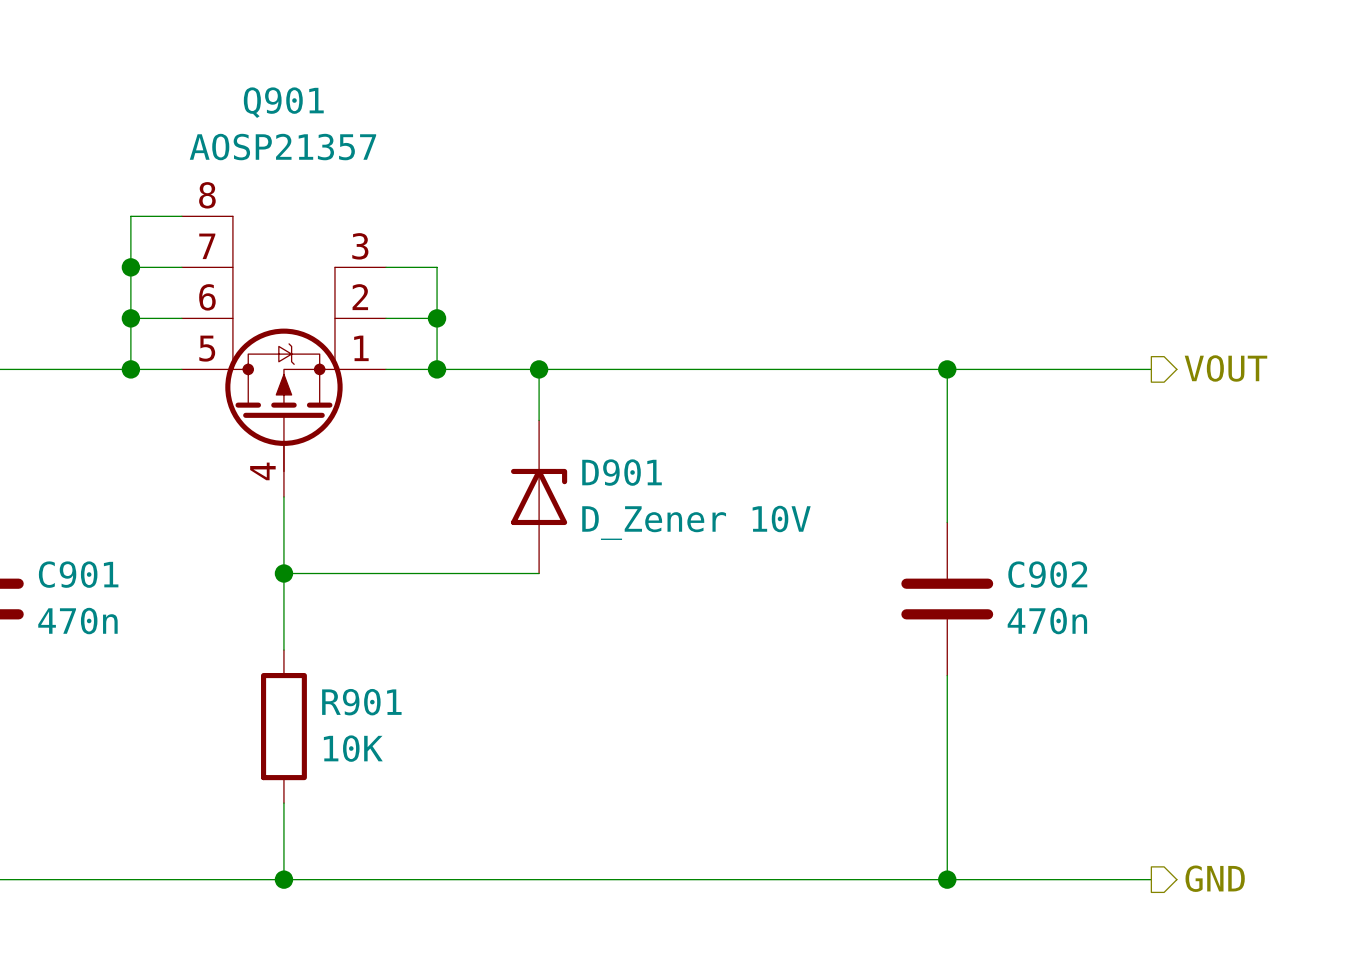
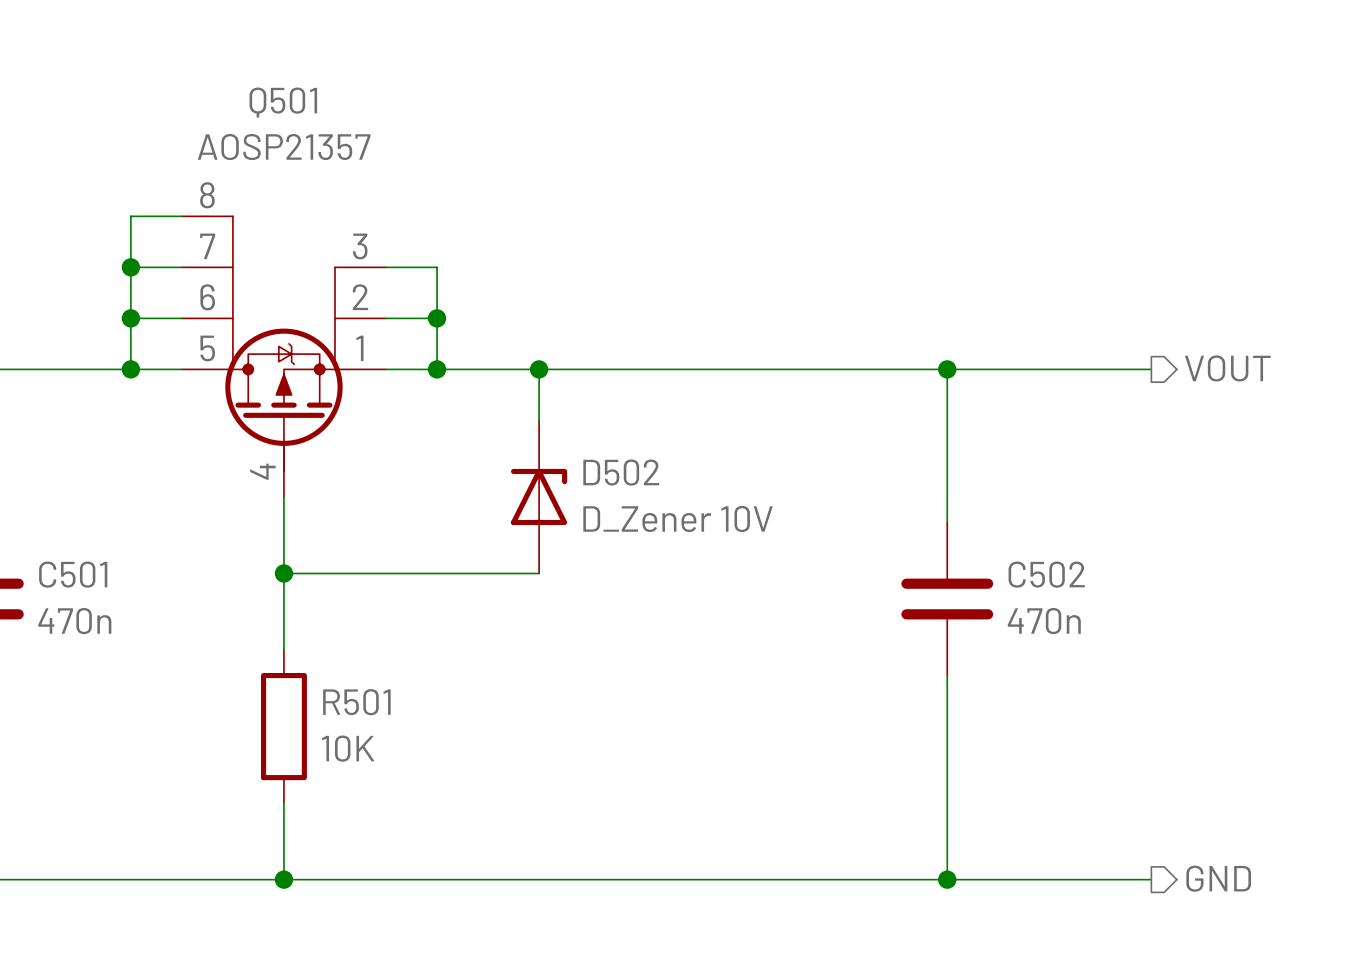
Q901 name: Q901 (283, 102) -> Q501 (283, 102)
D901 name: D901 (622, 472) -> D502 (621, 472)
C901 name: C901 (78, 574) -> C501 (73, 574)
C902 name: C902 (1047, 574) -> C502 (1046, 574)
R901 name: R901 (361, 702) -> R501 (356, 702)

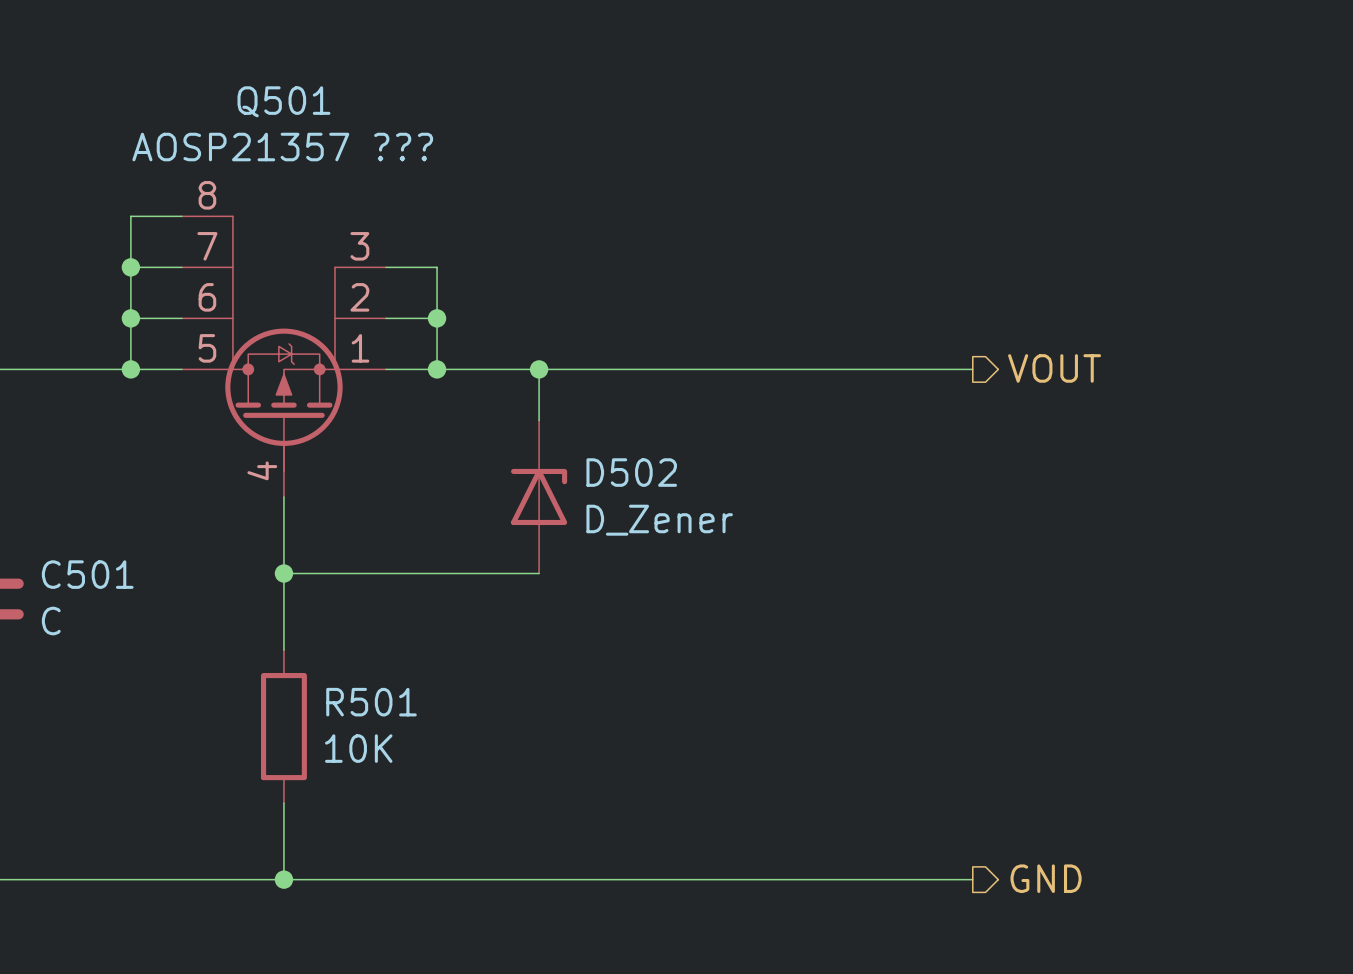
Q501 value: AOSP21357 (284, 147) -> AOSP21357 ??? (282, 147)
hierarchical label position: VOUT (1227, 368) -> VOUT (1054, 368)
wire: (947, 369) (947, 522) -> none
junction: (947, 369) -> none
wire: (972, 369) (1151, 369) -> none
D502 value: D_Zener 10V (678, 518) -> D_Zener (659, 520)
C502: 470n (947, 599) -> none
C501 value: 470n (74, 621) -> C (51, 621)
wire: (947, 675) (947, 879) -> none
hierarchical label position: GND (1218, 878) -> GND (1046, 878)
junction: (947, 879) -> none
wire: (972, 879) (1151, 879) -> none

